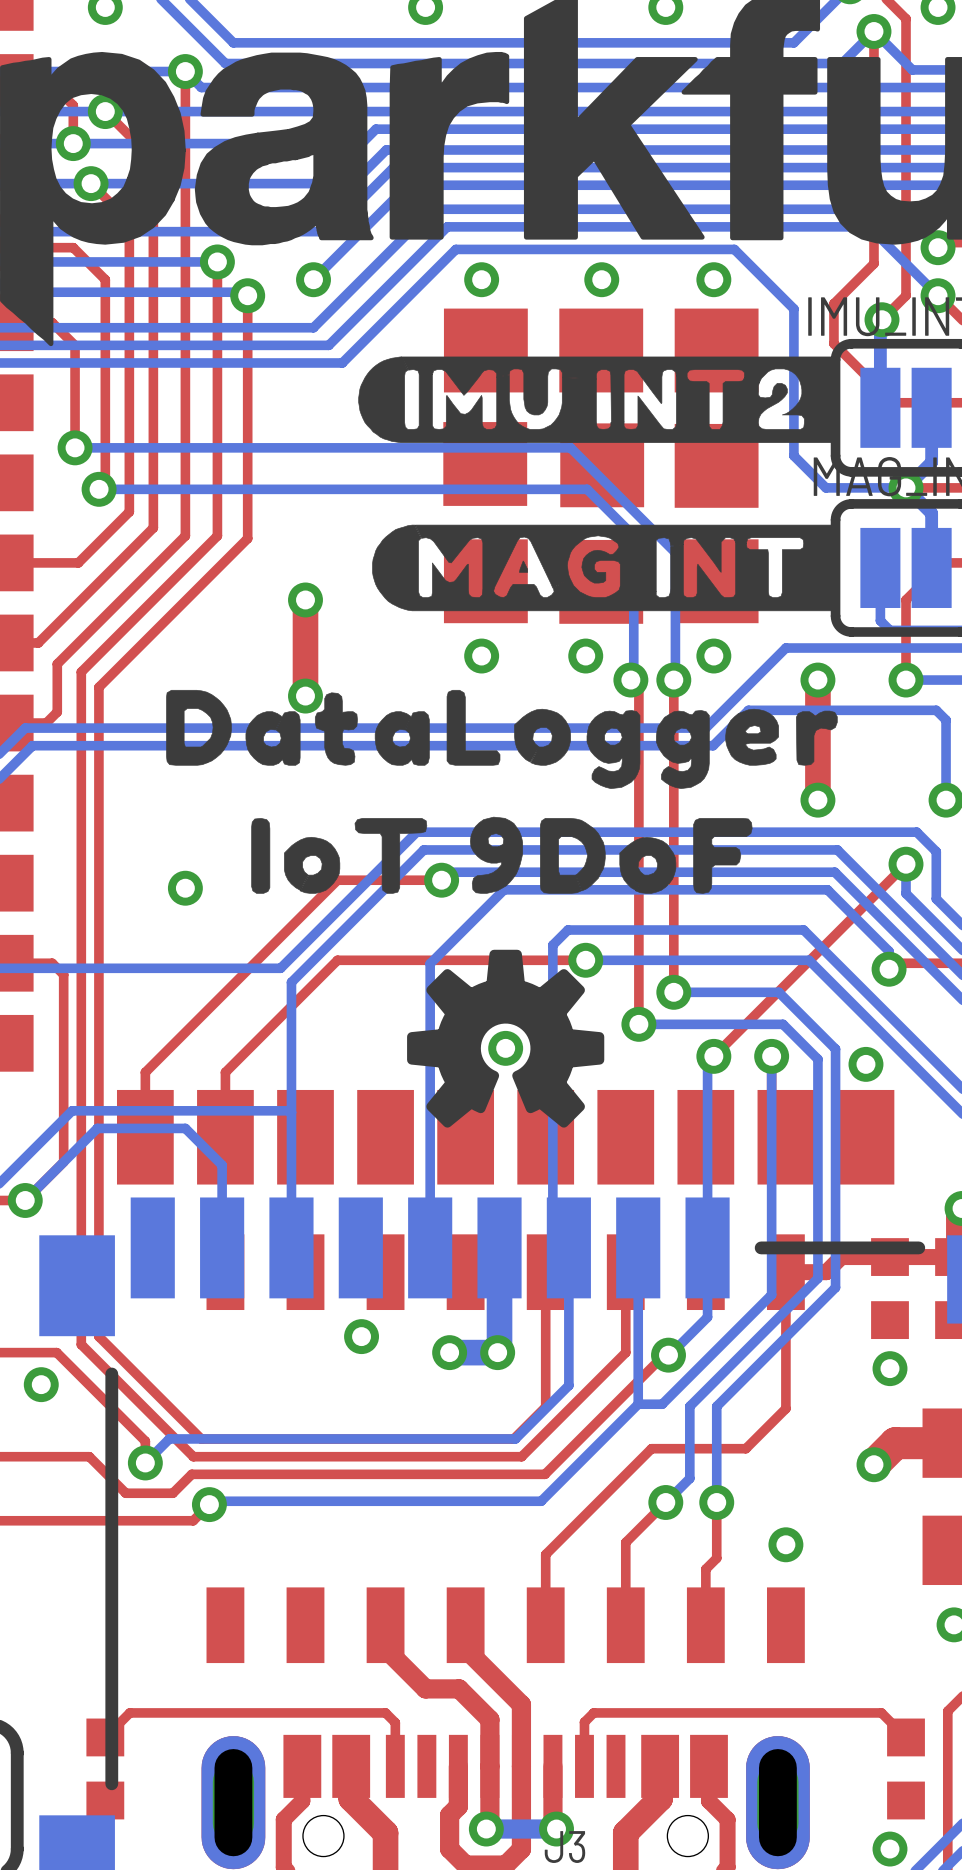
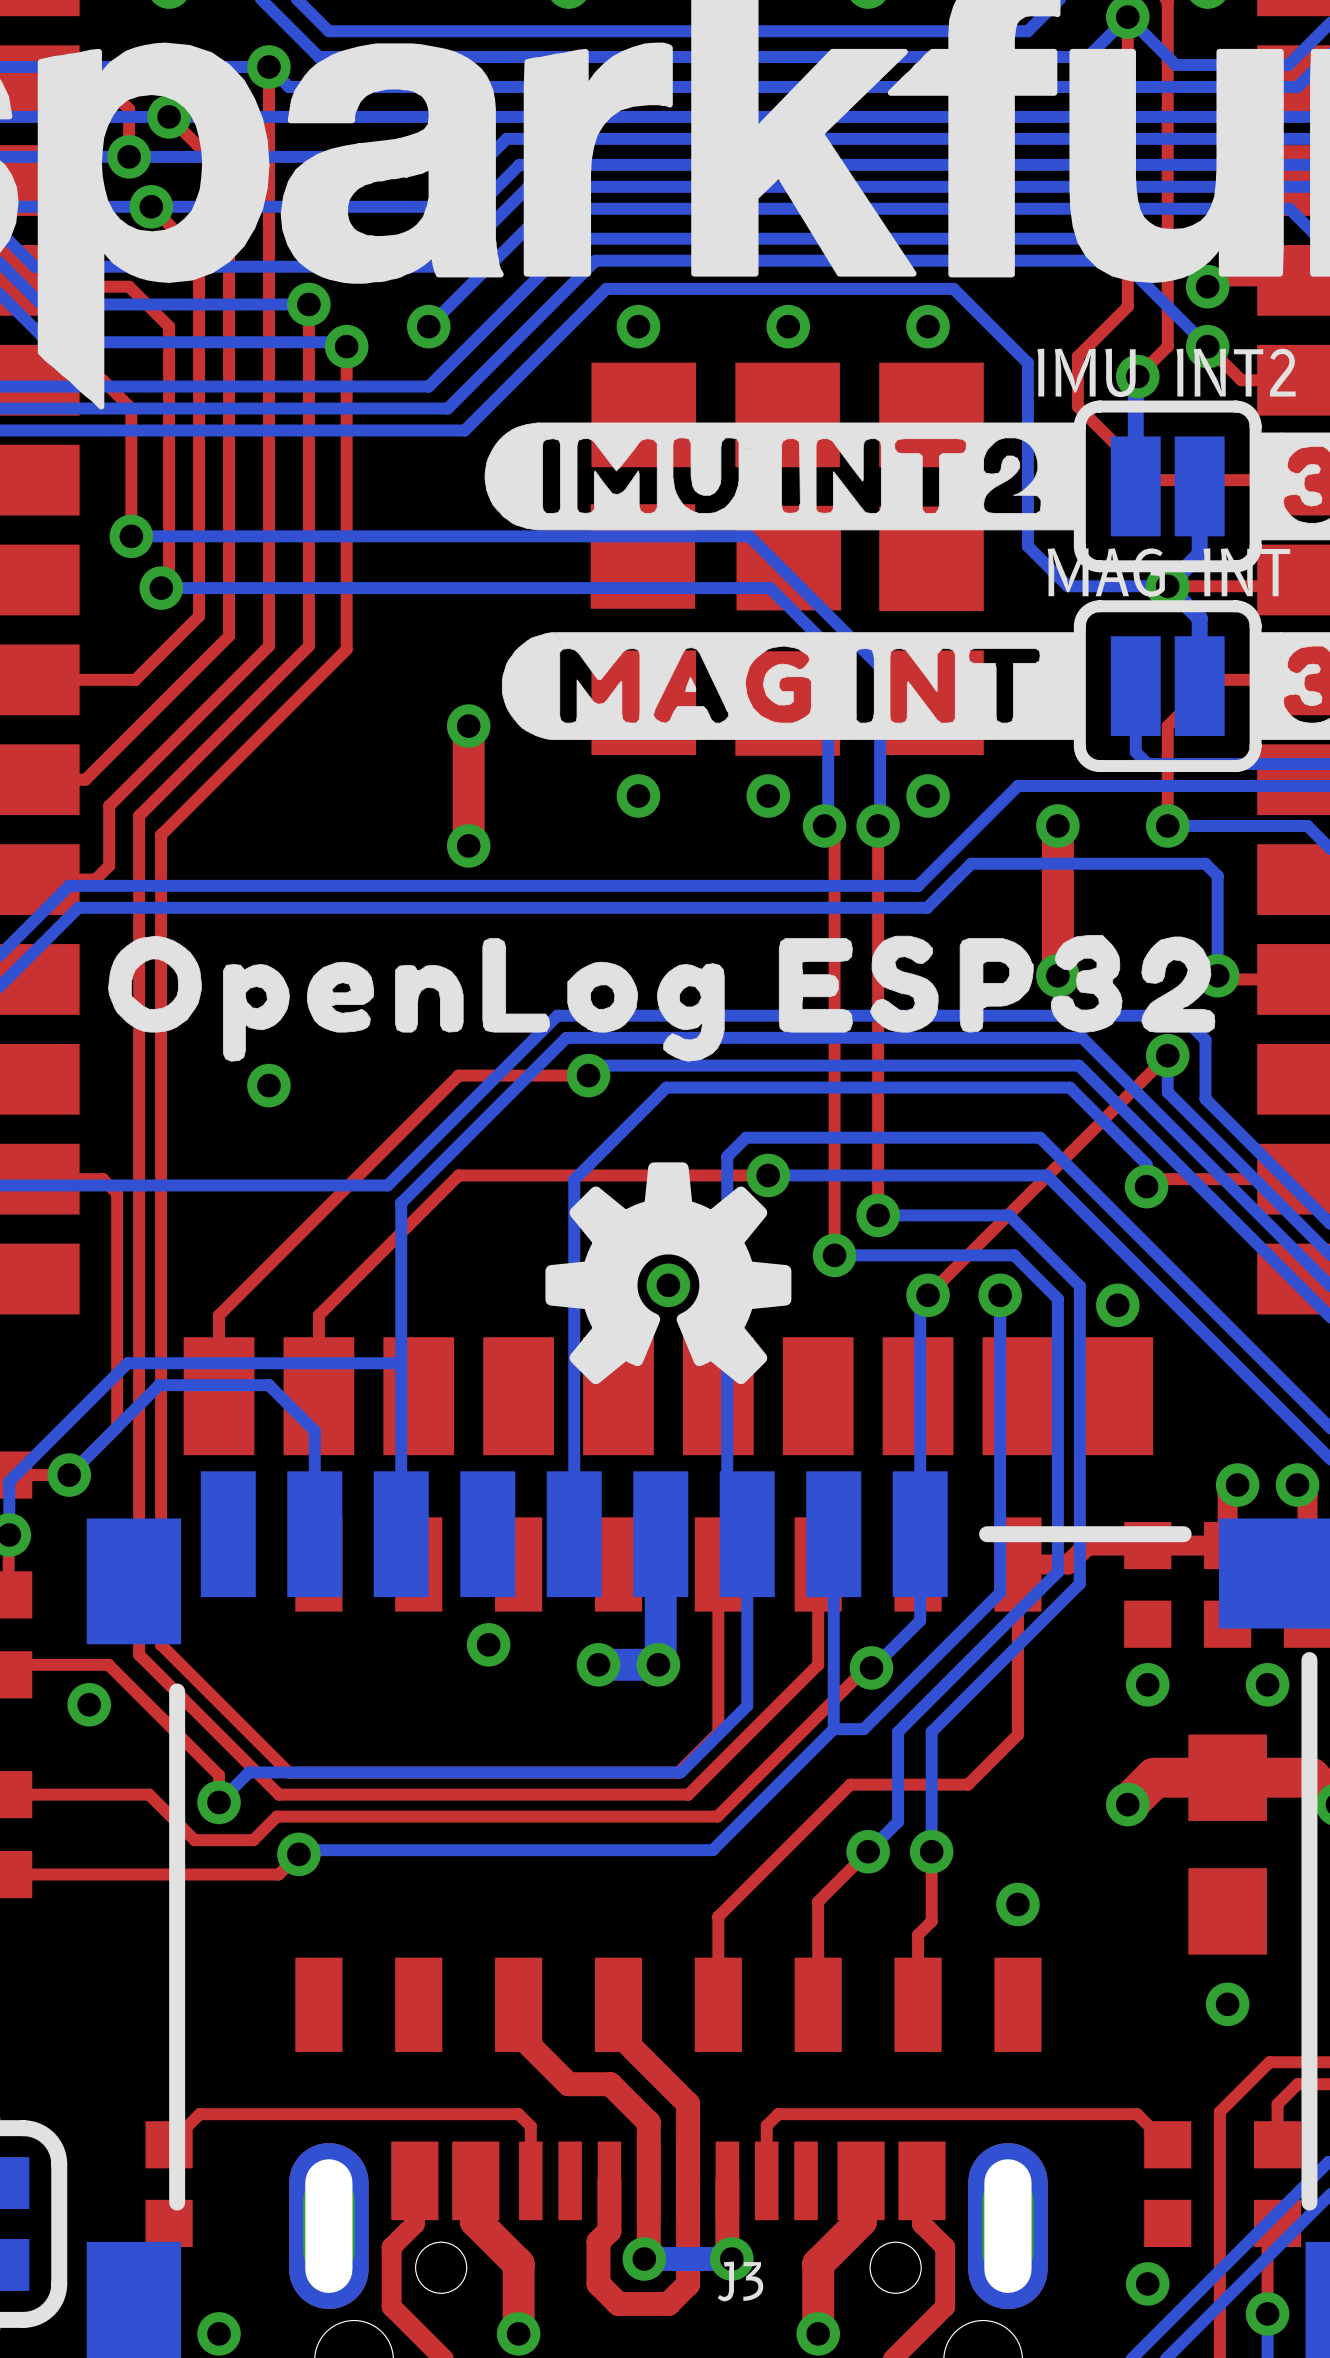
top track: (305, 599) (305, 696) -> (468, 726) (468, 845)
via position: (305, 599) -> (468, 726)
drawing: [166, 689, 838, 789] -> none
via position: (305, 696) -> (468, 845)
drawing shape: [251, 816, 753, 894] -> [108, 935, 1216, 1062]

